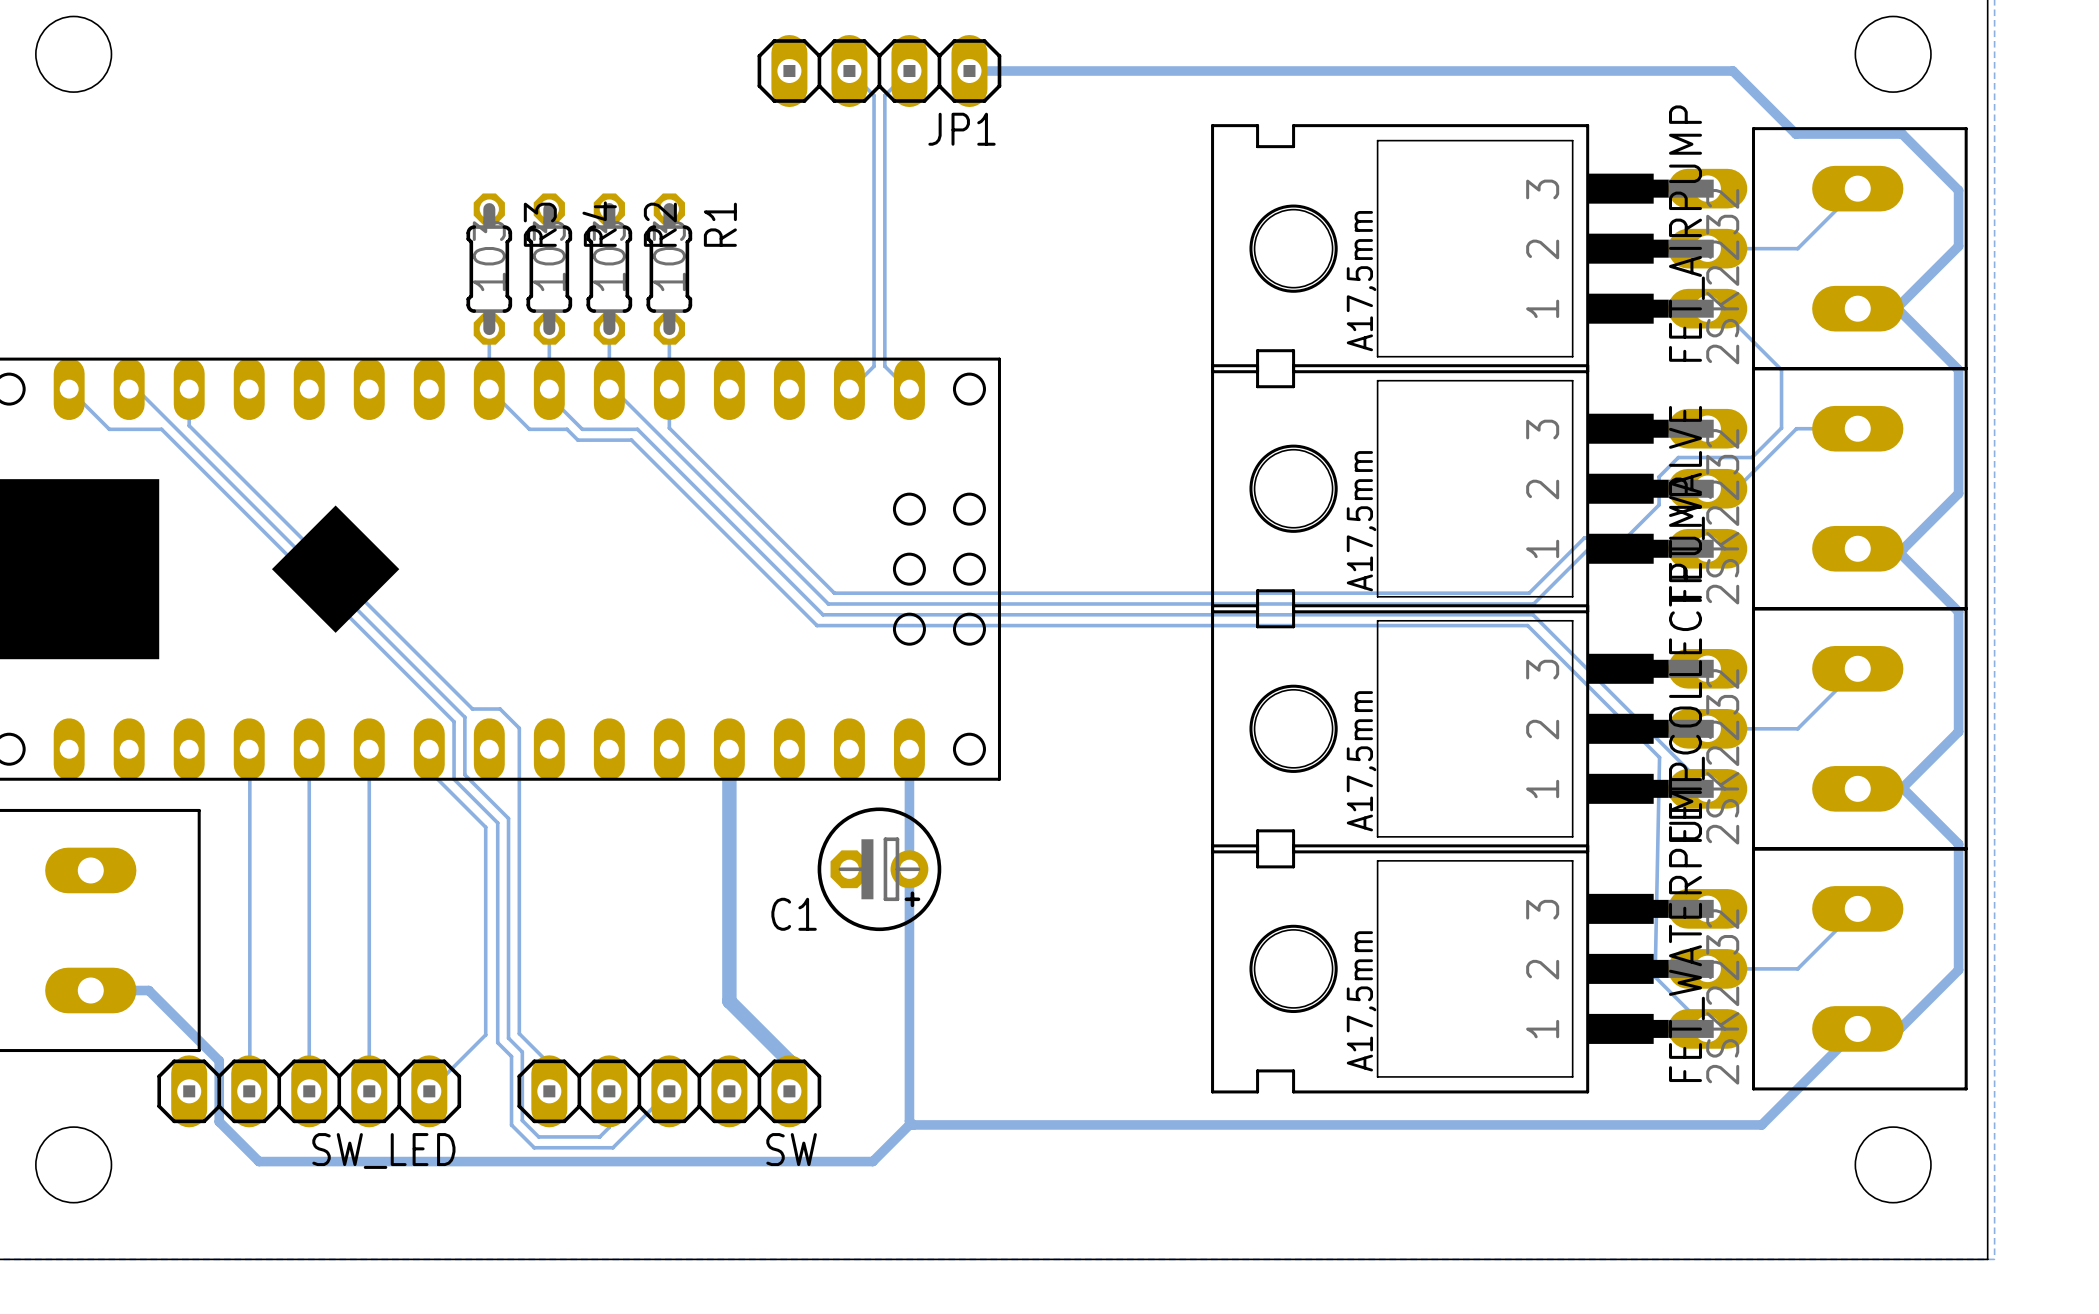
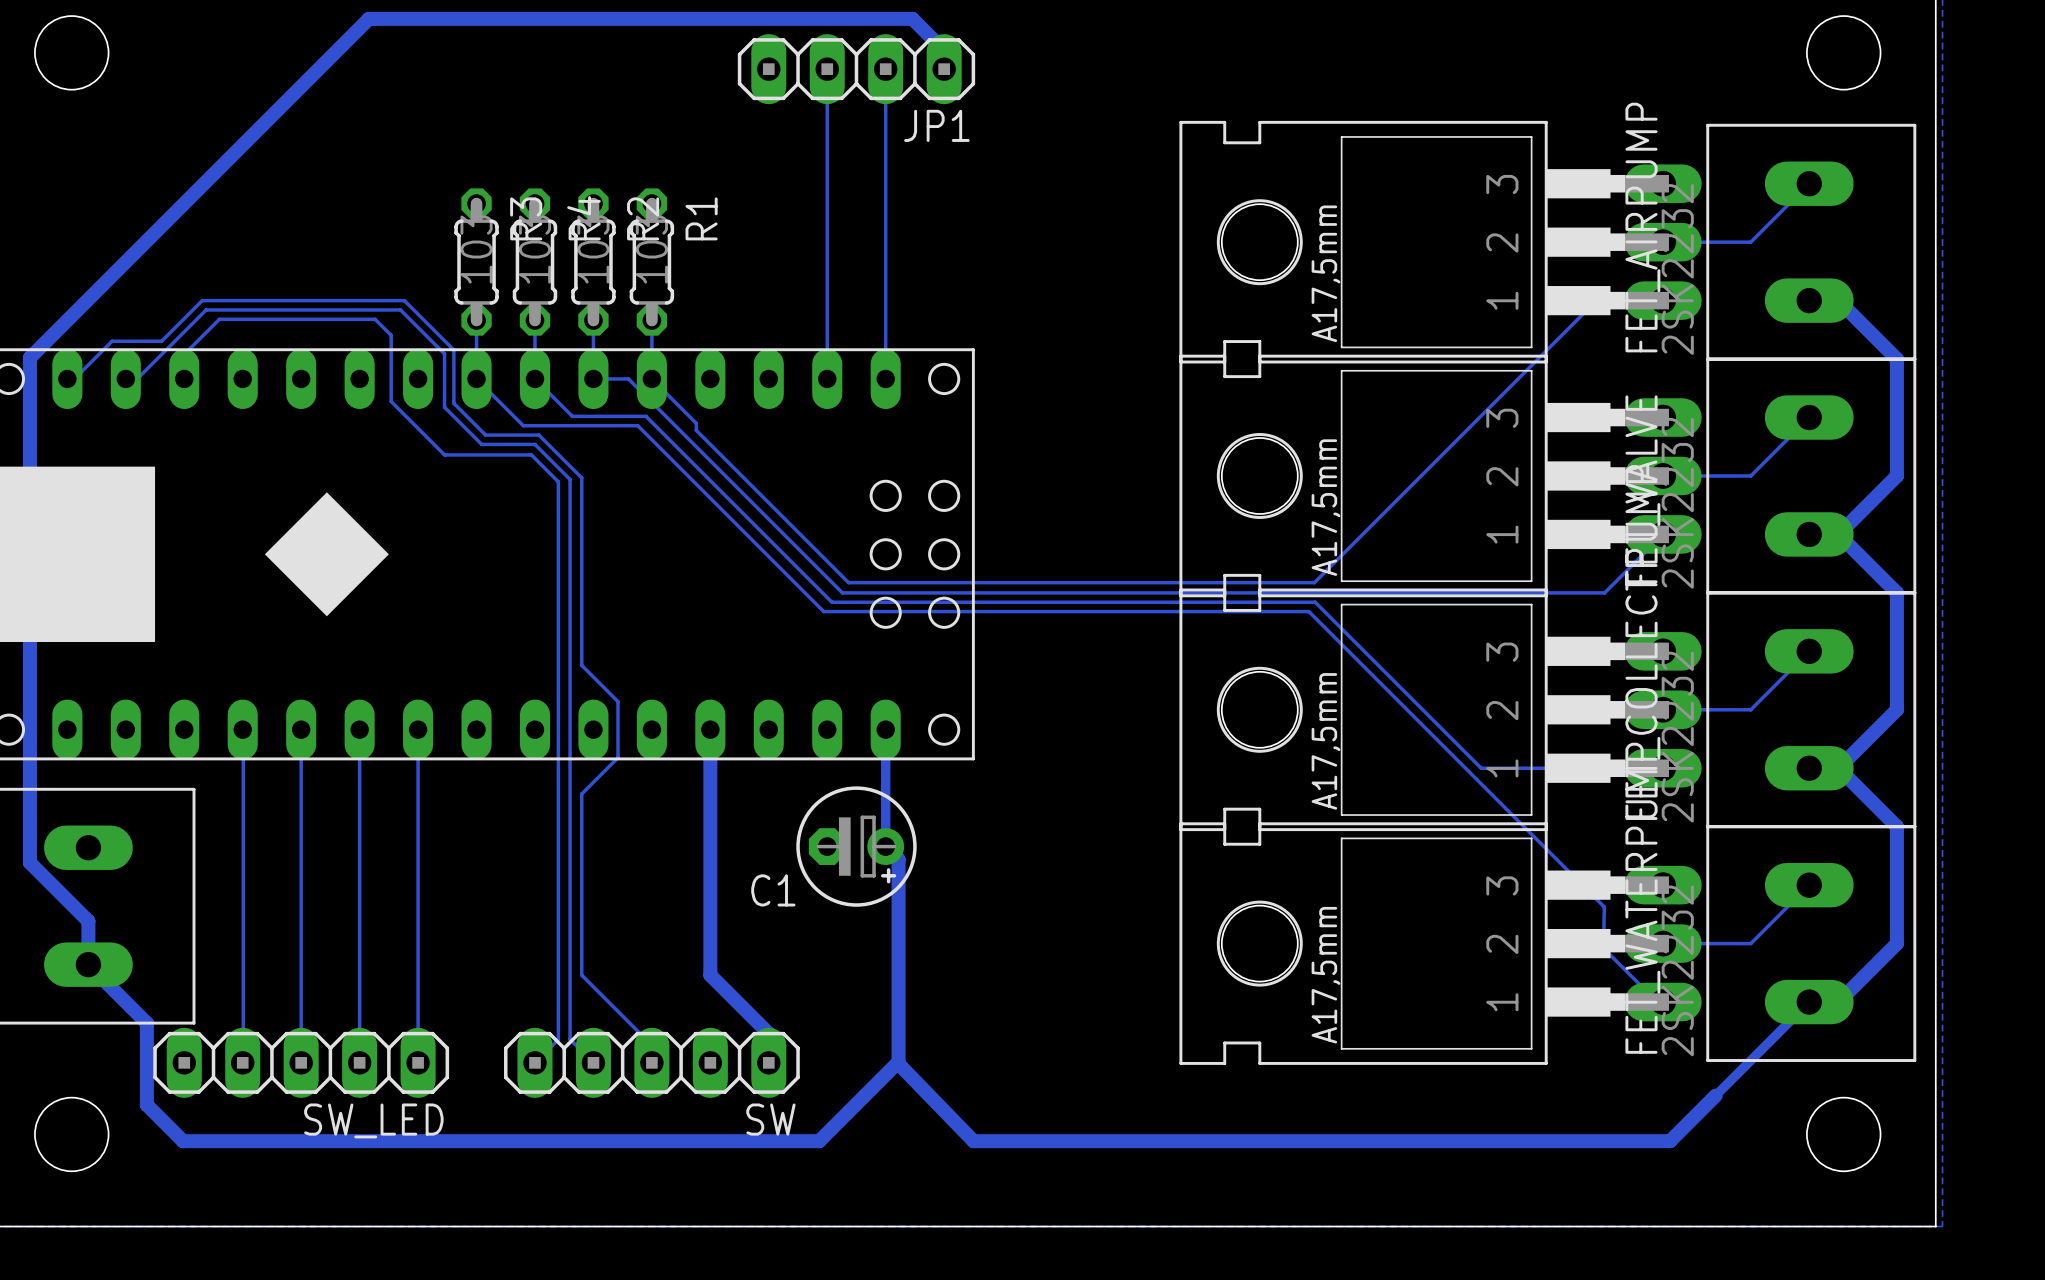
bottom track: (849, 71) (874, 95) (874, 366) (849, 389) -> (827, 69) (827, 378)
bottom track: (909, 71) (884, 95) (884, 366) (909, 389) -> (885, 69) (885, 378)
bottom track: (969, 71) (1732, 71) (1795, 134) (1902, 134) (1958, 190) (1958, 246) (1896, 308) -> (944, 69) (944, 50) (912, 18) (368, 18) (29, 357) (29, 862) (88, 921) (88, 964) (146, 1023) (146, 1104) (183, 1141) (819, 1141) (897, 1062)
bottom track: (1707, 308) (1720, 308) (1781, 369) (1781, 428) (1752, 457) (1678, 457) (1659, 476) (1659, 504) (1626, 537) (1584, 537) (1529, 593) (834, 593) (669, 428) (669, 389) -> (1663, 300) (1596, 300) (1314, 582) (848, 582) (696, 430) (696, 423) (651, 378)
bottom track: (1887, 308) (1897, 308) (1958, 369) (1958, 493) (1903, 548) (1887, 548) -> (1838, 300) (1896, 359) (1896, 475) (1838, 534) (1896, 592) (1896, 709) (1838, 768) (1896, 826) (1896, 943) (1838, 1002)
bottom track: (129, 389) (136, 389) (464, 717) (464, 774) (508, 818) (508, 1038) (522, 1052) (522, 1120) (538, 1136) (599, 1136) (609, 1127) (609, 1091) -> (125, 378) (136, 380) (206, 309) (400, 309) (444, 353) (444, 407) (481, 444) (534, 444) (570, 479) (570, 1039) (593, 1062)
bottom track: (189, 389) (189, 425) (472, 709) (500, 709) (519, 728) (519, 1033) (549, 1063) (549, 1091) -> (184, 378) (184, 354) (219, 319) (375, 319) (391, 335) (391, 401) (444, 454) (531, 454) (558, 481) (558, 1039) (534, 1062)
bottom track: (549, 389) (549, 396) (582, 429) (637, 429) (823, 614) (1533, 614) (1707, 788) -> (534, 378) (572, 416) (646, 416) (831, 602) (1315, 602) (1481, 768) (1662, 768)
bottom track: (613, 389) (828, 603) (1533, 603) (1588, 548) (1707, 548) -> (597, 378) (628, 378) (842, 592) (1604, 592) (1663, 534)
bottom track: (70, 390) (109, 429) (161, 429) (454, 721) (454, 779) (497, 822) (497, 1042) (511, 1056) (511, 1125) (534, 1147) (612, 1147) (669, 1091) -> (68, 380) (73, 380) (112, 341) (161, 341) (202, 300) (404, 300) (453, 350) (453, 403) (485, 435) (538, 435) (581, 477) (581, 665) (617, 701) (617, 757) (581, 793) (581, 975) (651, 1045) (651, 1062)
bottom track: (1857, 428) (1796, 428) (1736, 488) -> (1809, 417) (1750, 475) (1691, 475)
bottom track: (529, 429) (567, 429) (577, 440) (631, 440) (817, 625) (1527, 625) (1659, 757) (1655, 976) (1707, 1028) -> (515, 418) (523, 425) (637, 425) (823, 611) (1308, 611) (1604, 907) (1603, 948) (1657, 1002) (1662, 1002)
bottom track: (1895, 548) (1958, 611) (1958, 731) (1901, 788) -> none
bottom track: (429, 770) (485, 827) (485, 1034) (429, 1091) -> (418, 750) (418, 1062)
bottom track: (1887, 788) (1903, 788) (1958, 844) (1958, 970) (1899, 1028) (1887, 1028) -> none
bottom track: (909, 869) (909, 1121) (913, 1124) -> none
bottom track: none -> (890, 851) (898, 859) (897, 1062)
bottom track: (90, 990) (148, 990) (219, 1060) (219, 1121) (259, 1161) (872, 1161) (909, 1124) (1761, 1124) -> (897, 1062) (973, 1141) (1670, 1141) (1715, 1095)

